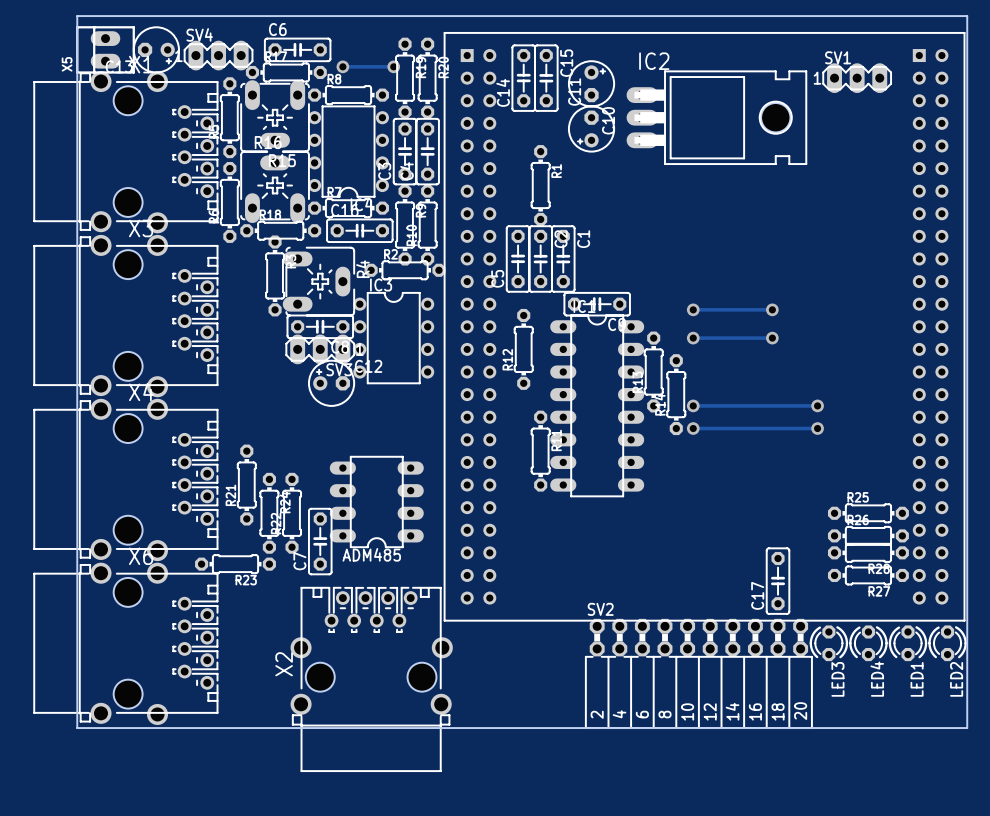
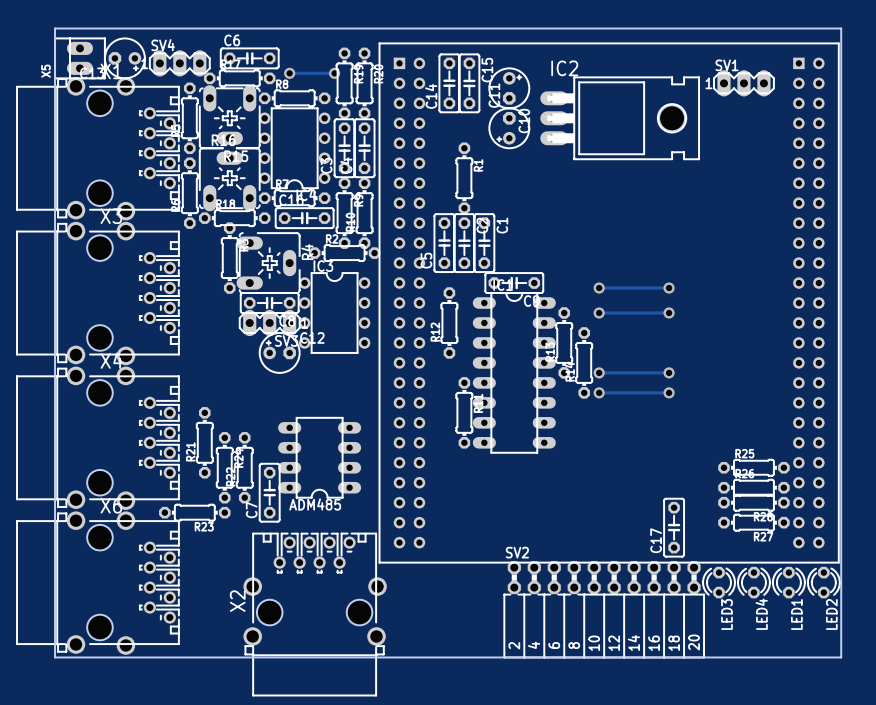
track: (772, 405) (817, 405) -> none
via: none -> (669, 372)
via: (817, 405) -> none
track: (772, 428) (817, 428) -> none
via: none -> (669, 392)
via: (817, 428) -> none

